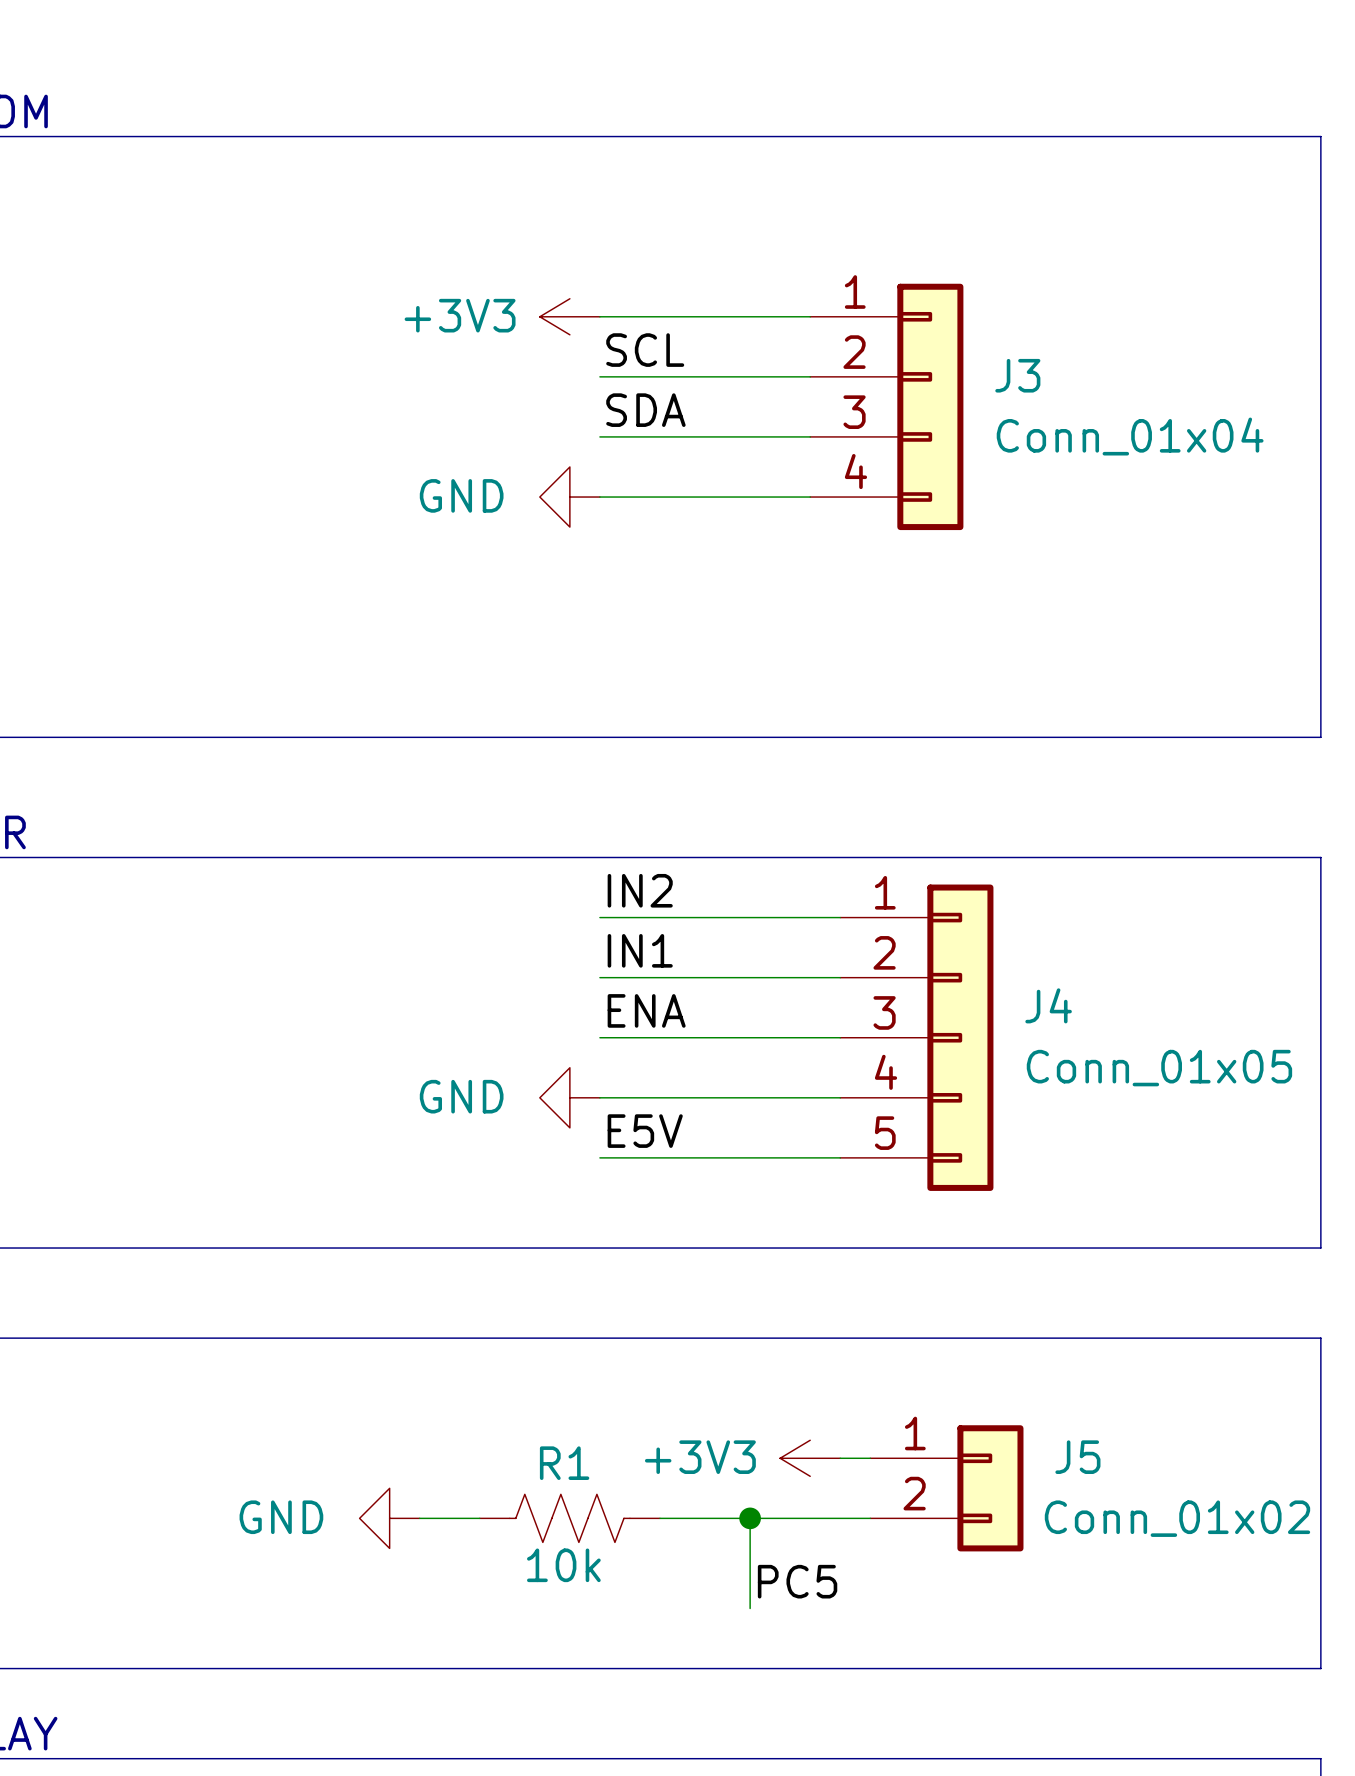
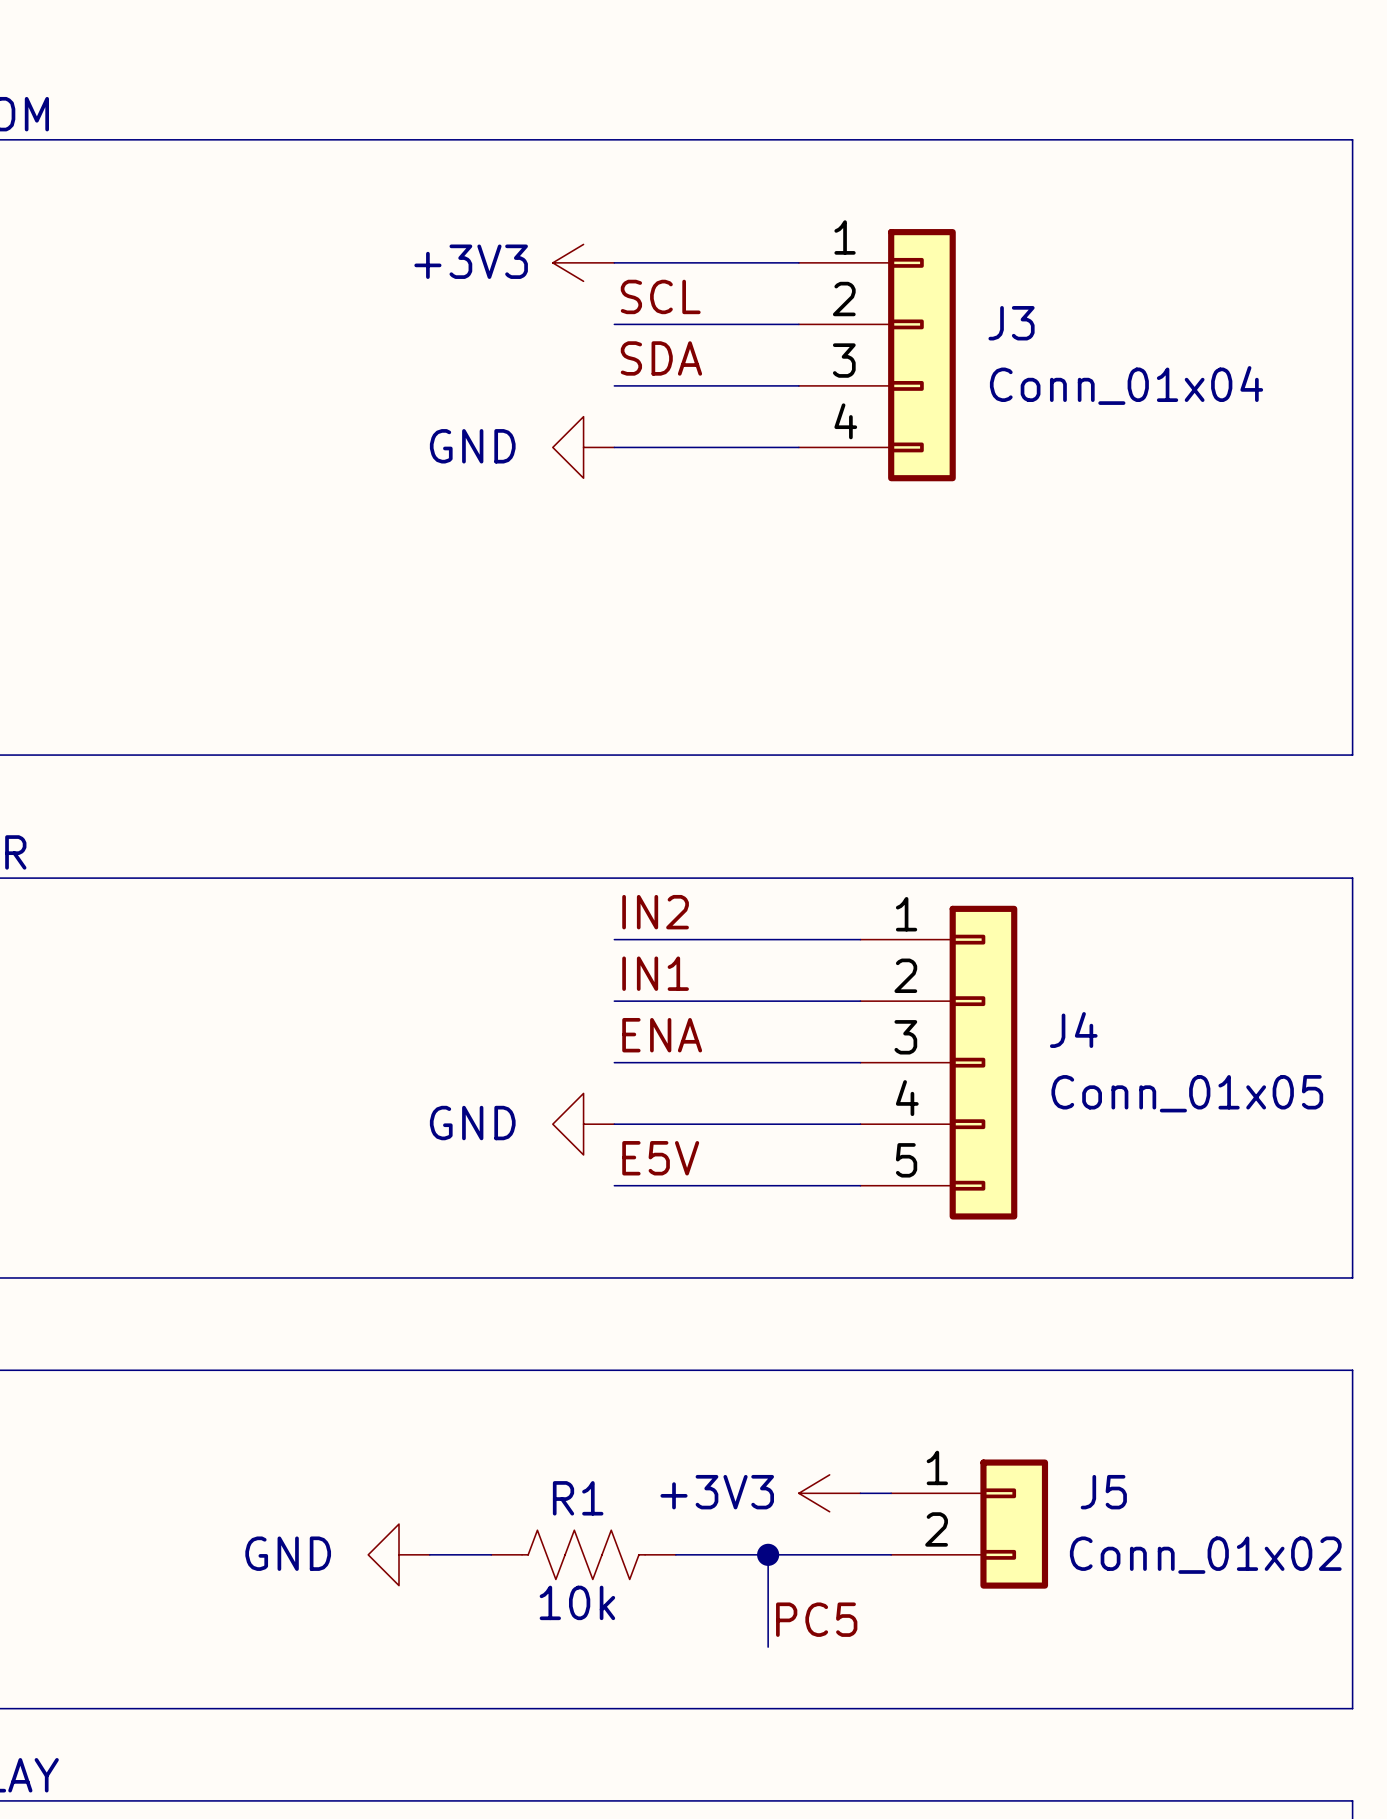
wire: none -> (614, 262) (798, 262)
label: none -> SCL (660, 296)
power symbol position: +3V3 (569, 316) -> +3V3 (583, 262)
label: SCL (645, 350) -> SDA (661, 358)
J3 position: (886, 406) -> (877, 355)
label: SDA (645, 410) -> none
power symbol position: GND (569, 497) -> GND (583, 447)
wire: (599, 497) (810, 497) -> none

